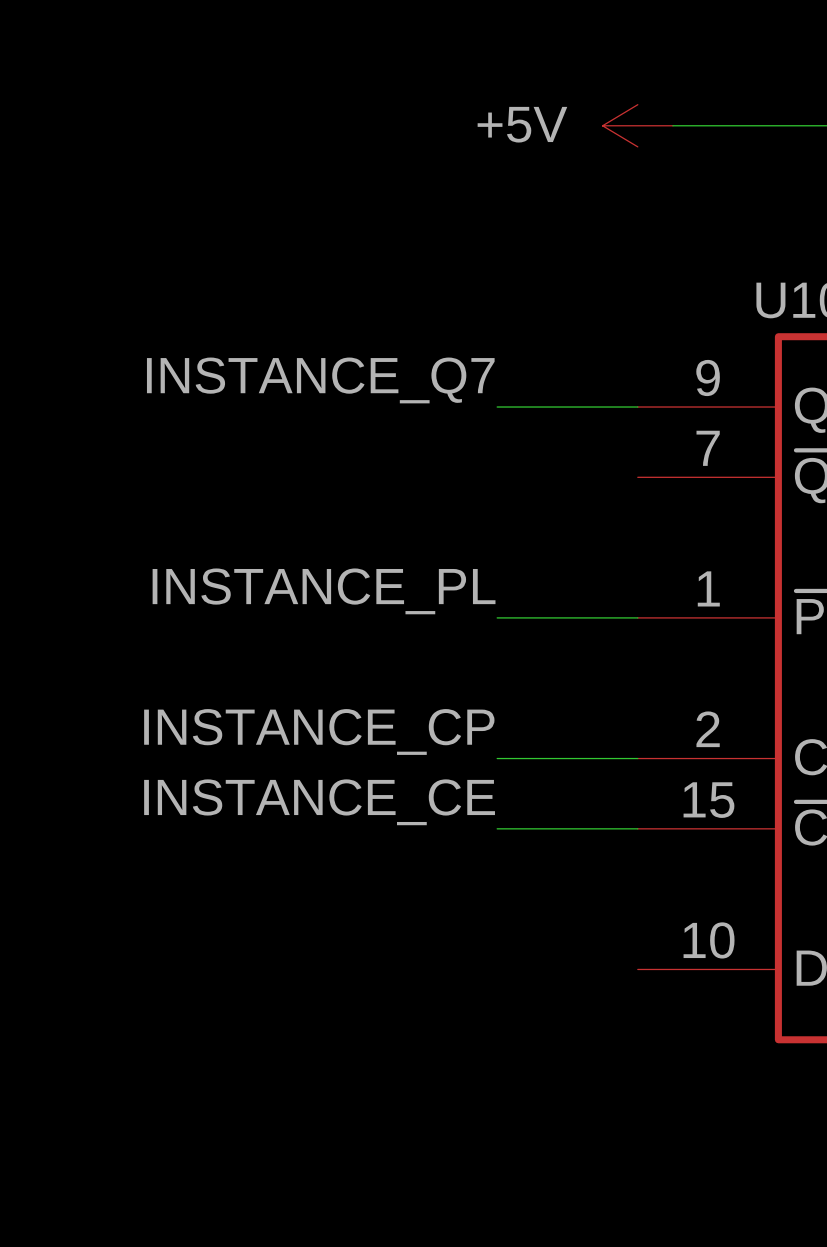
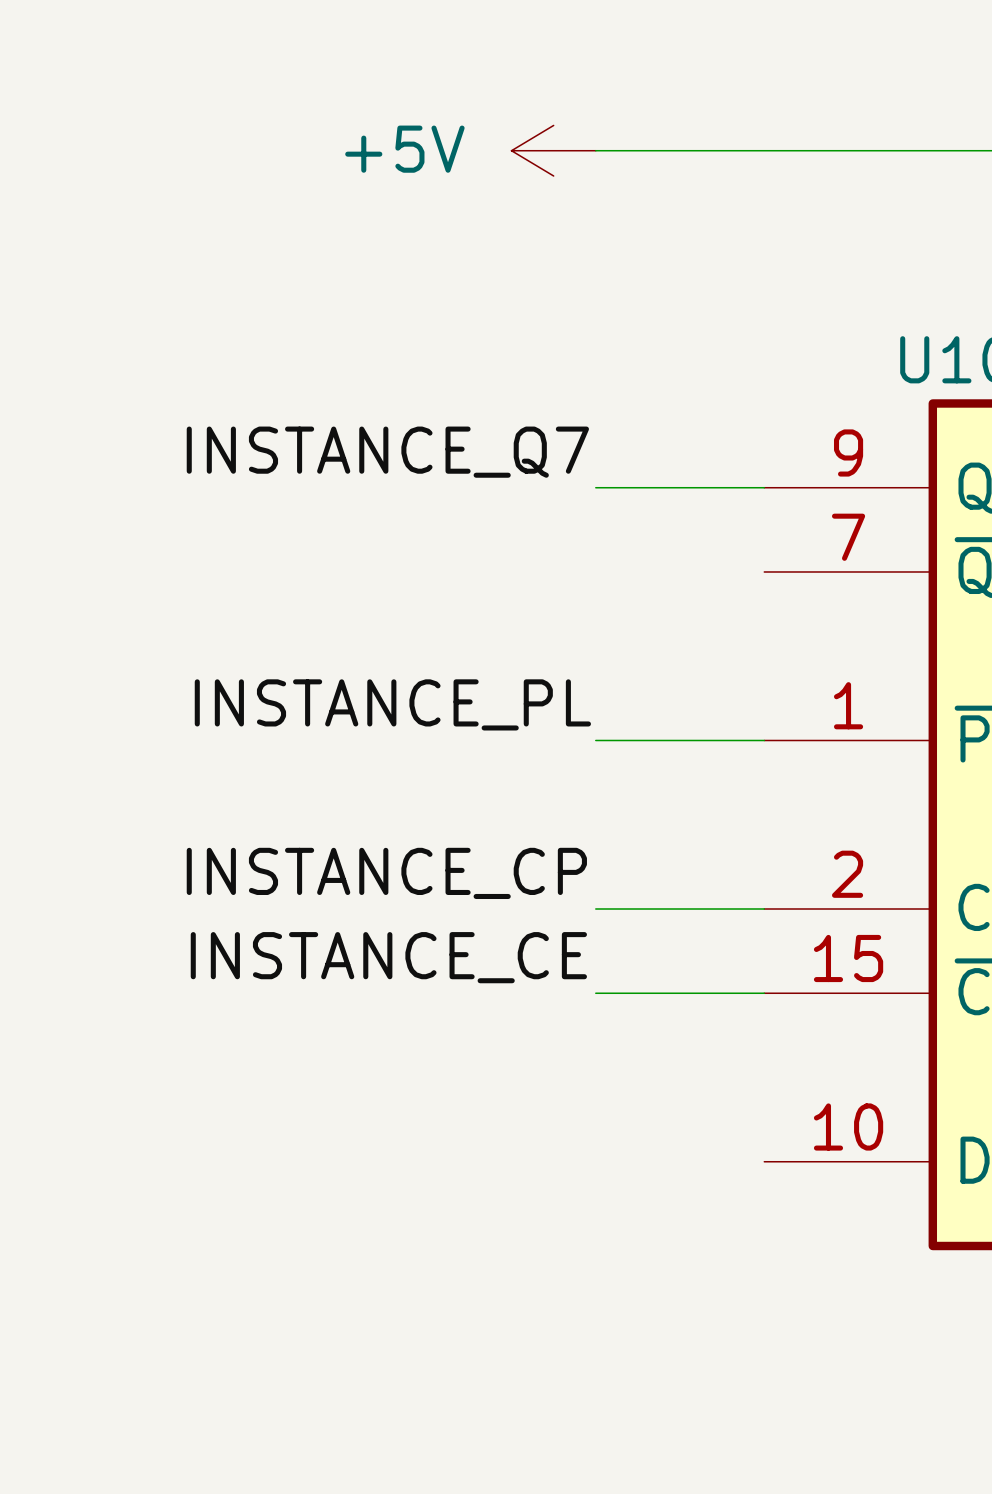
wire: none -> (595, 150) (806, 150)
power symbol position: +5V (637, 125) -> +5V (553, 150)

